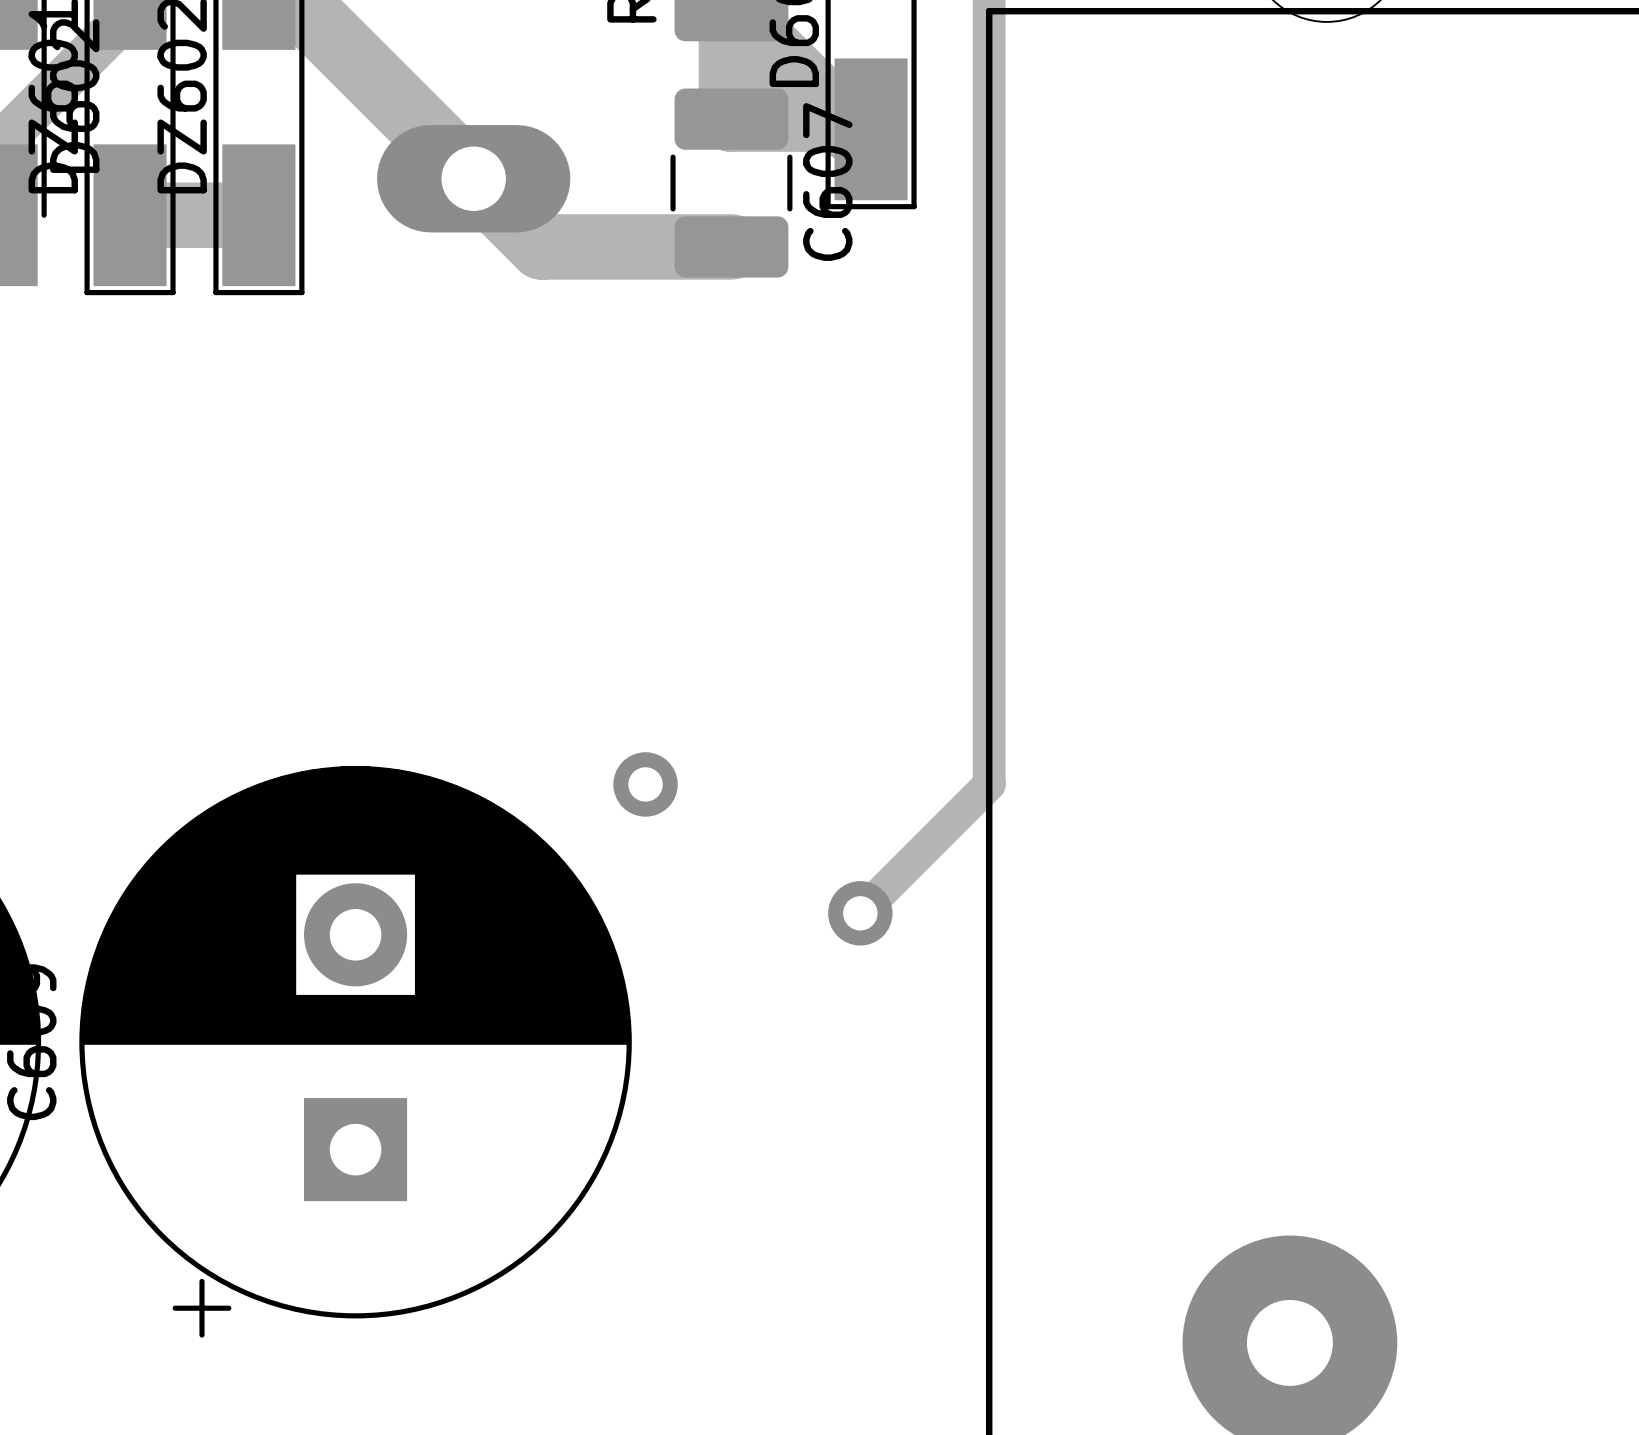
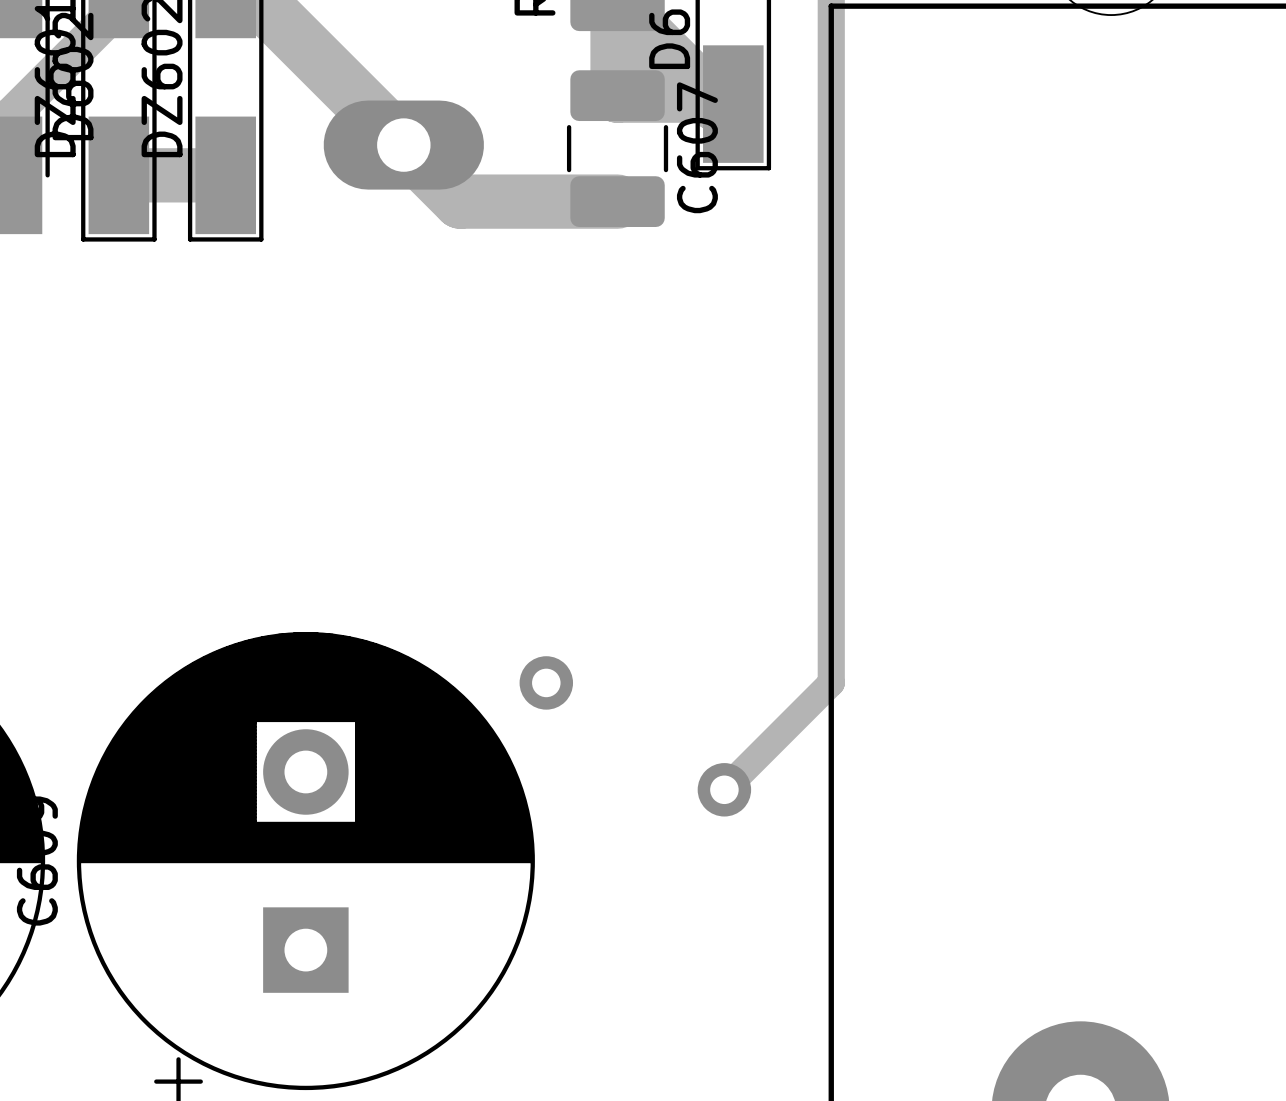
via position: (645, 784) -> (546, 682)
track: (989, 784) (860, 913) -> (831, 647) (831, 682) (724, 789)
via position: (860, 913) -> (724, 789)

